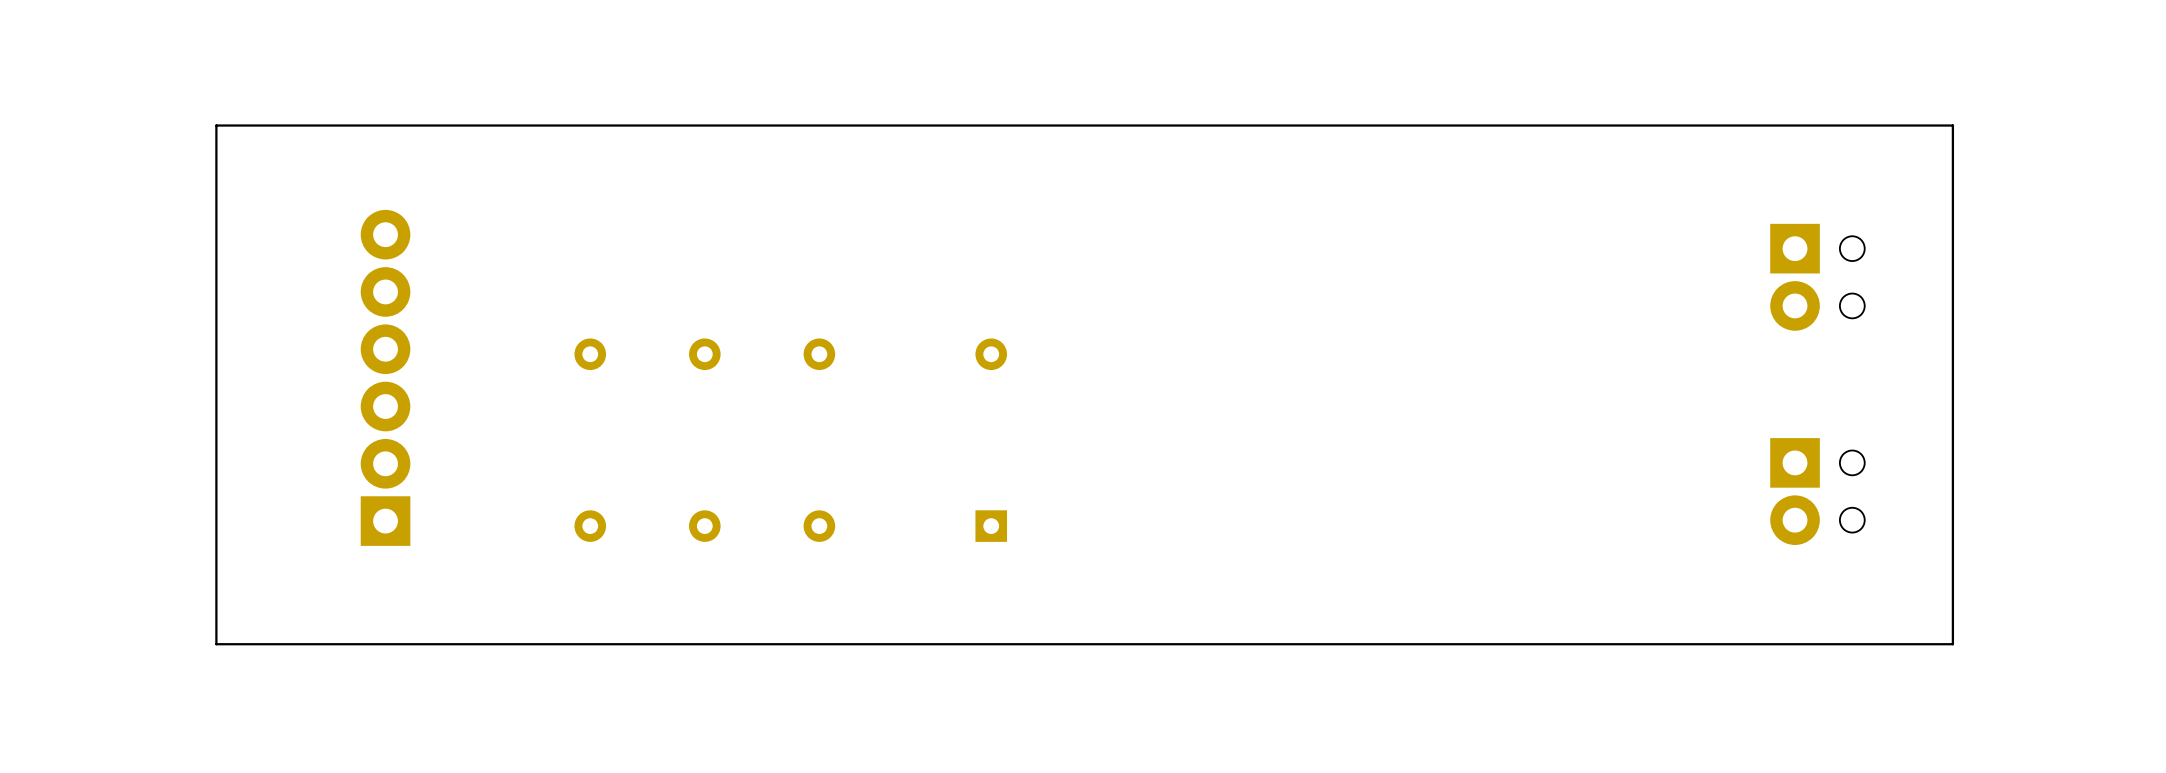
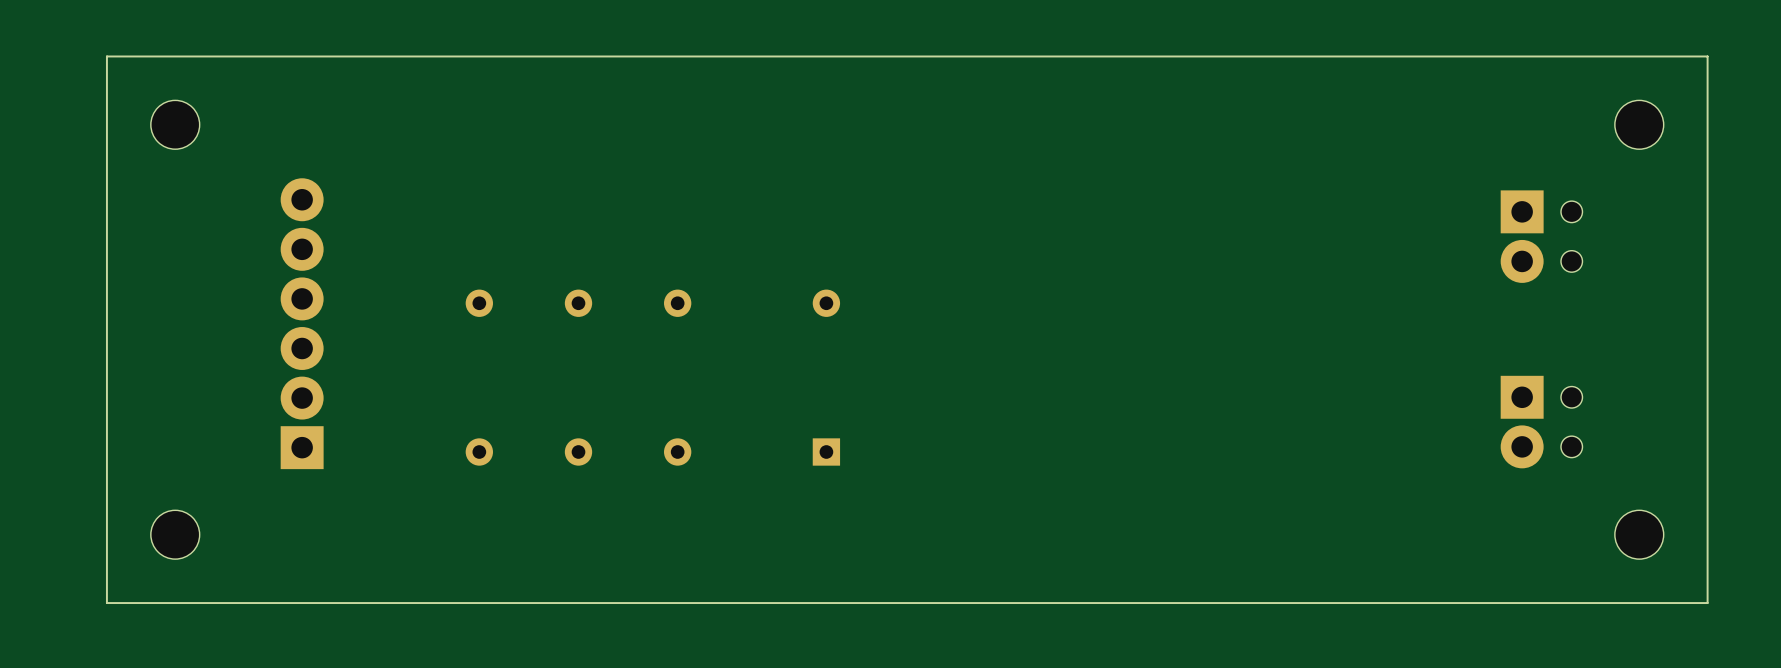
board edge: (1952, 125) (1952, 644) (216, 644) (216, 125) (1952, 125) -> (1707, 56) (1707, 603) (106, 603) (106, 56) (1707, 56)
part: none -> (175, 124)
part: none -> (1639, 124)
part: none -> (175, 534)
part: none -> (1639, 534)

